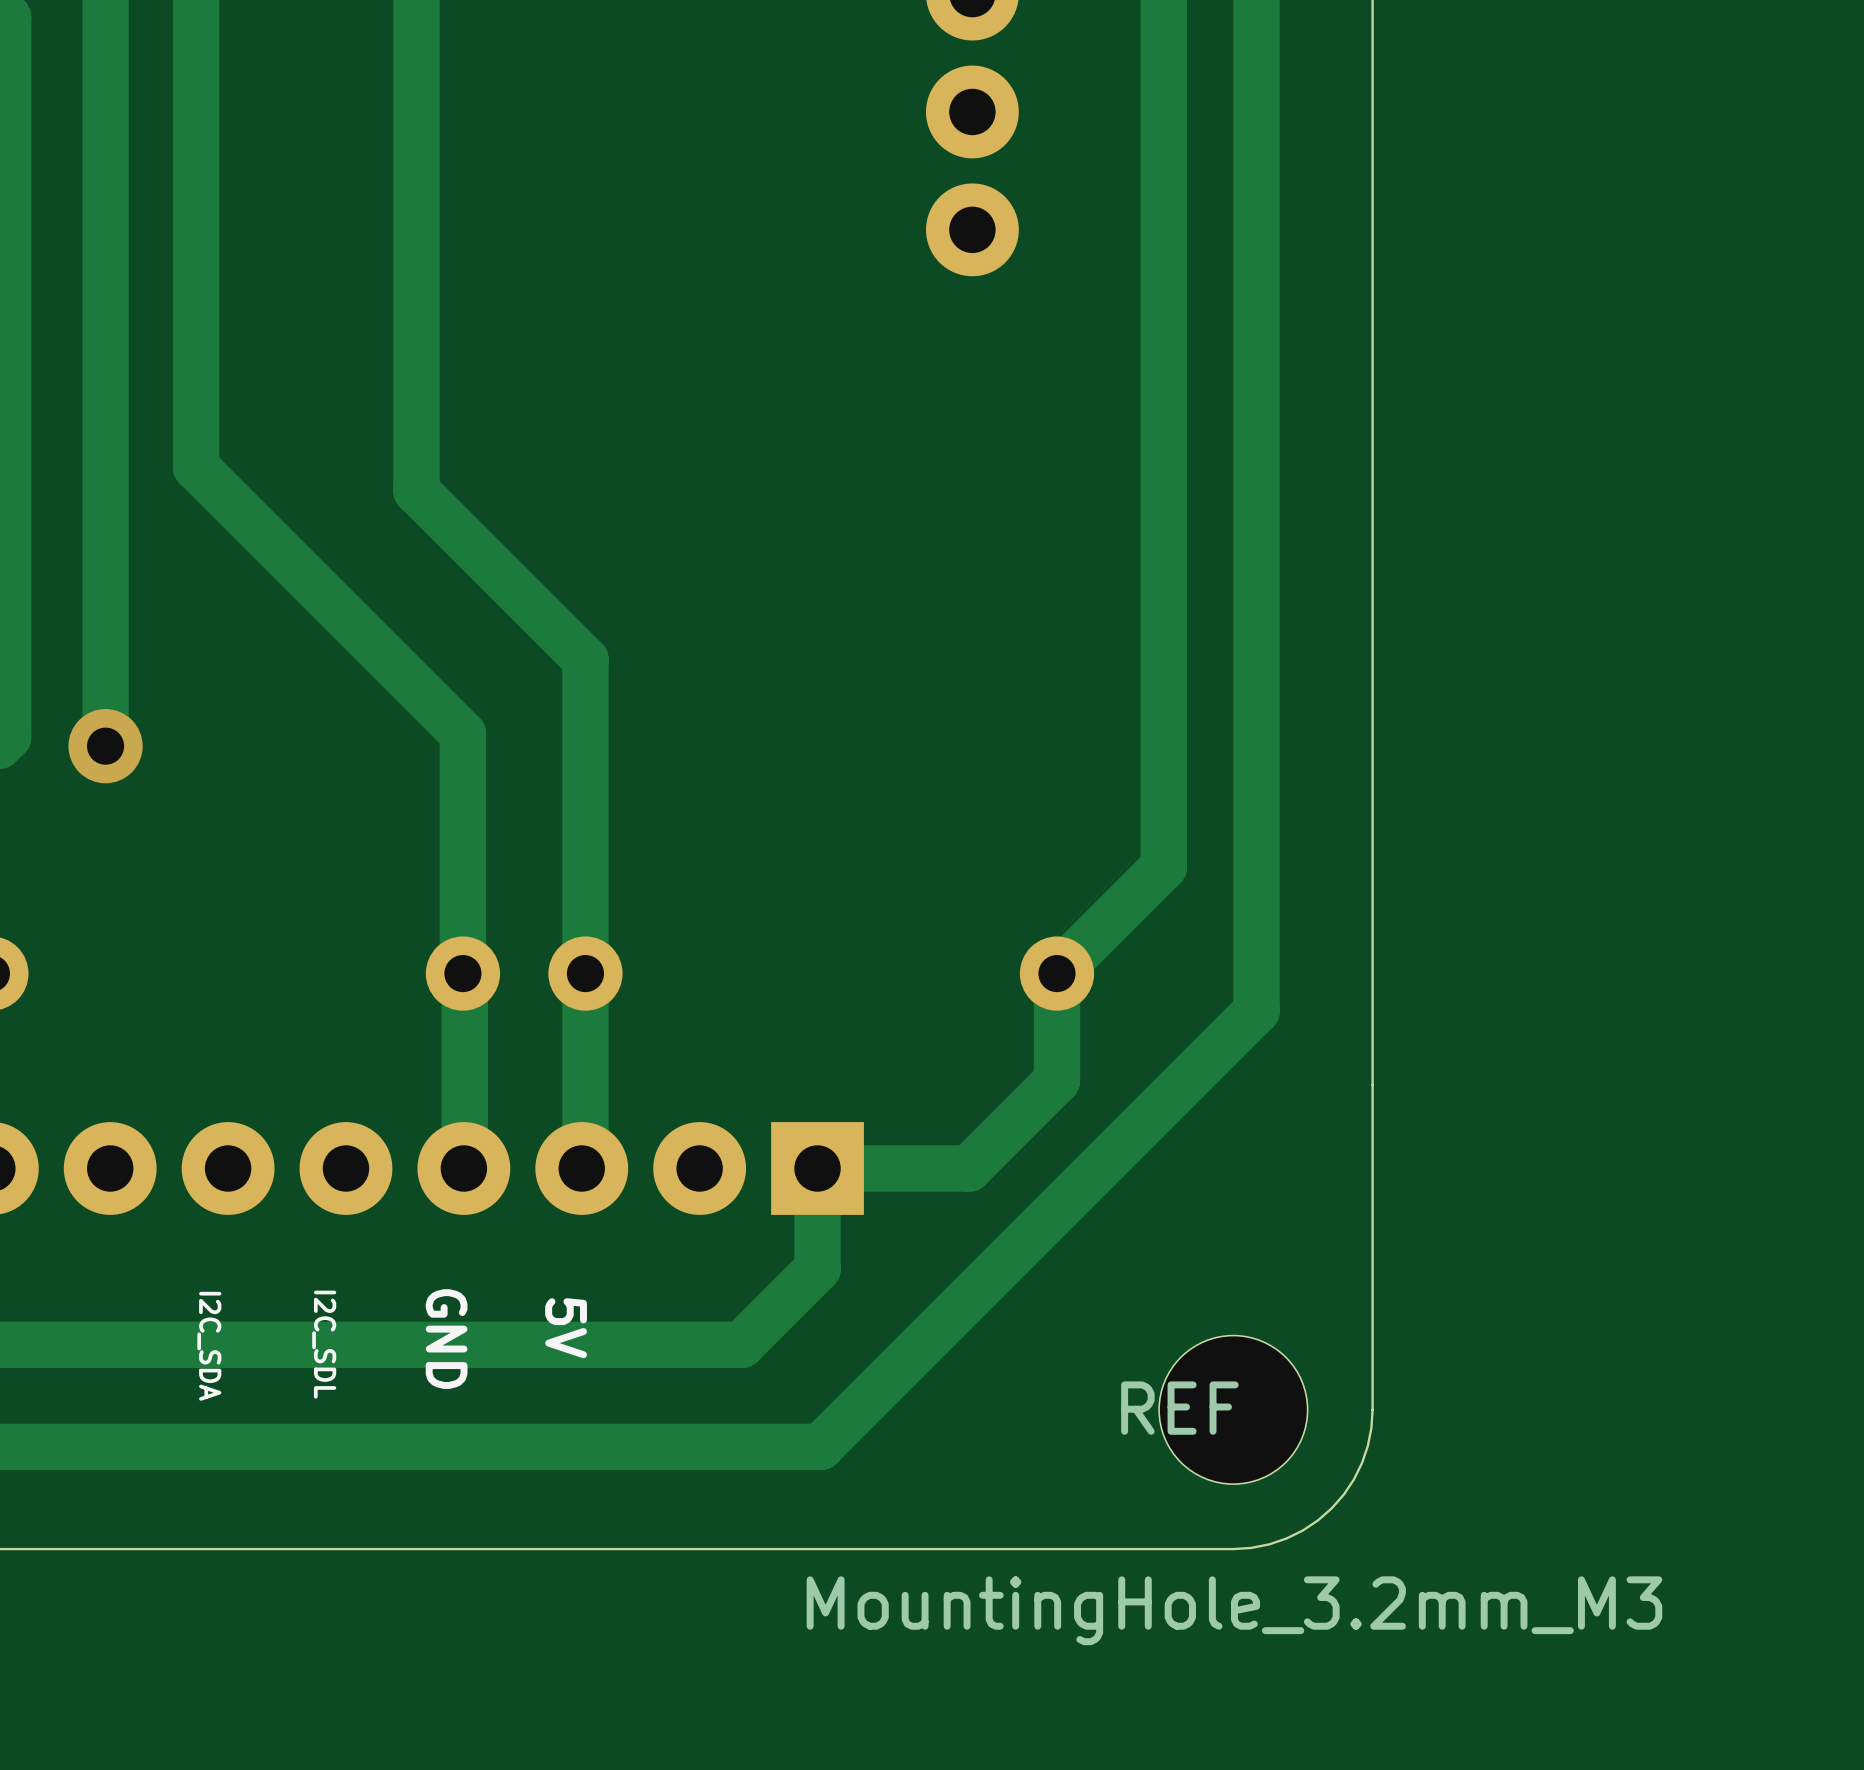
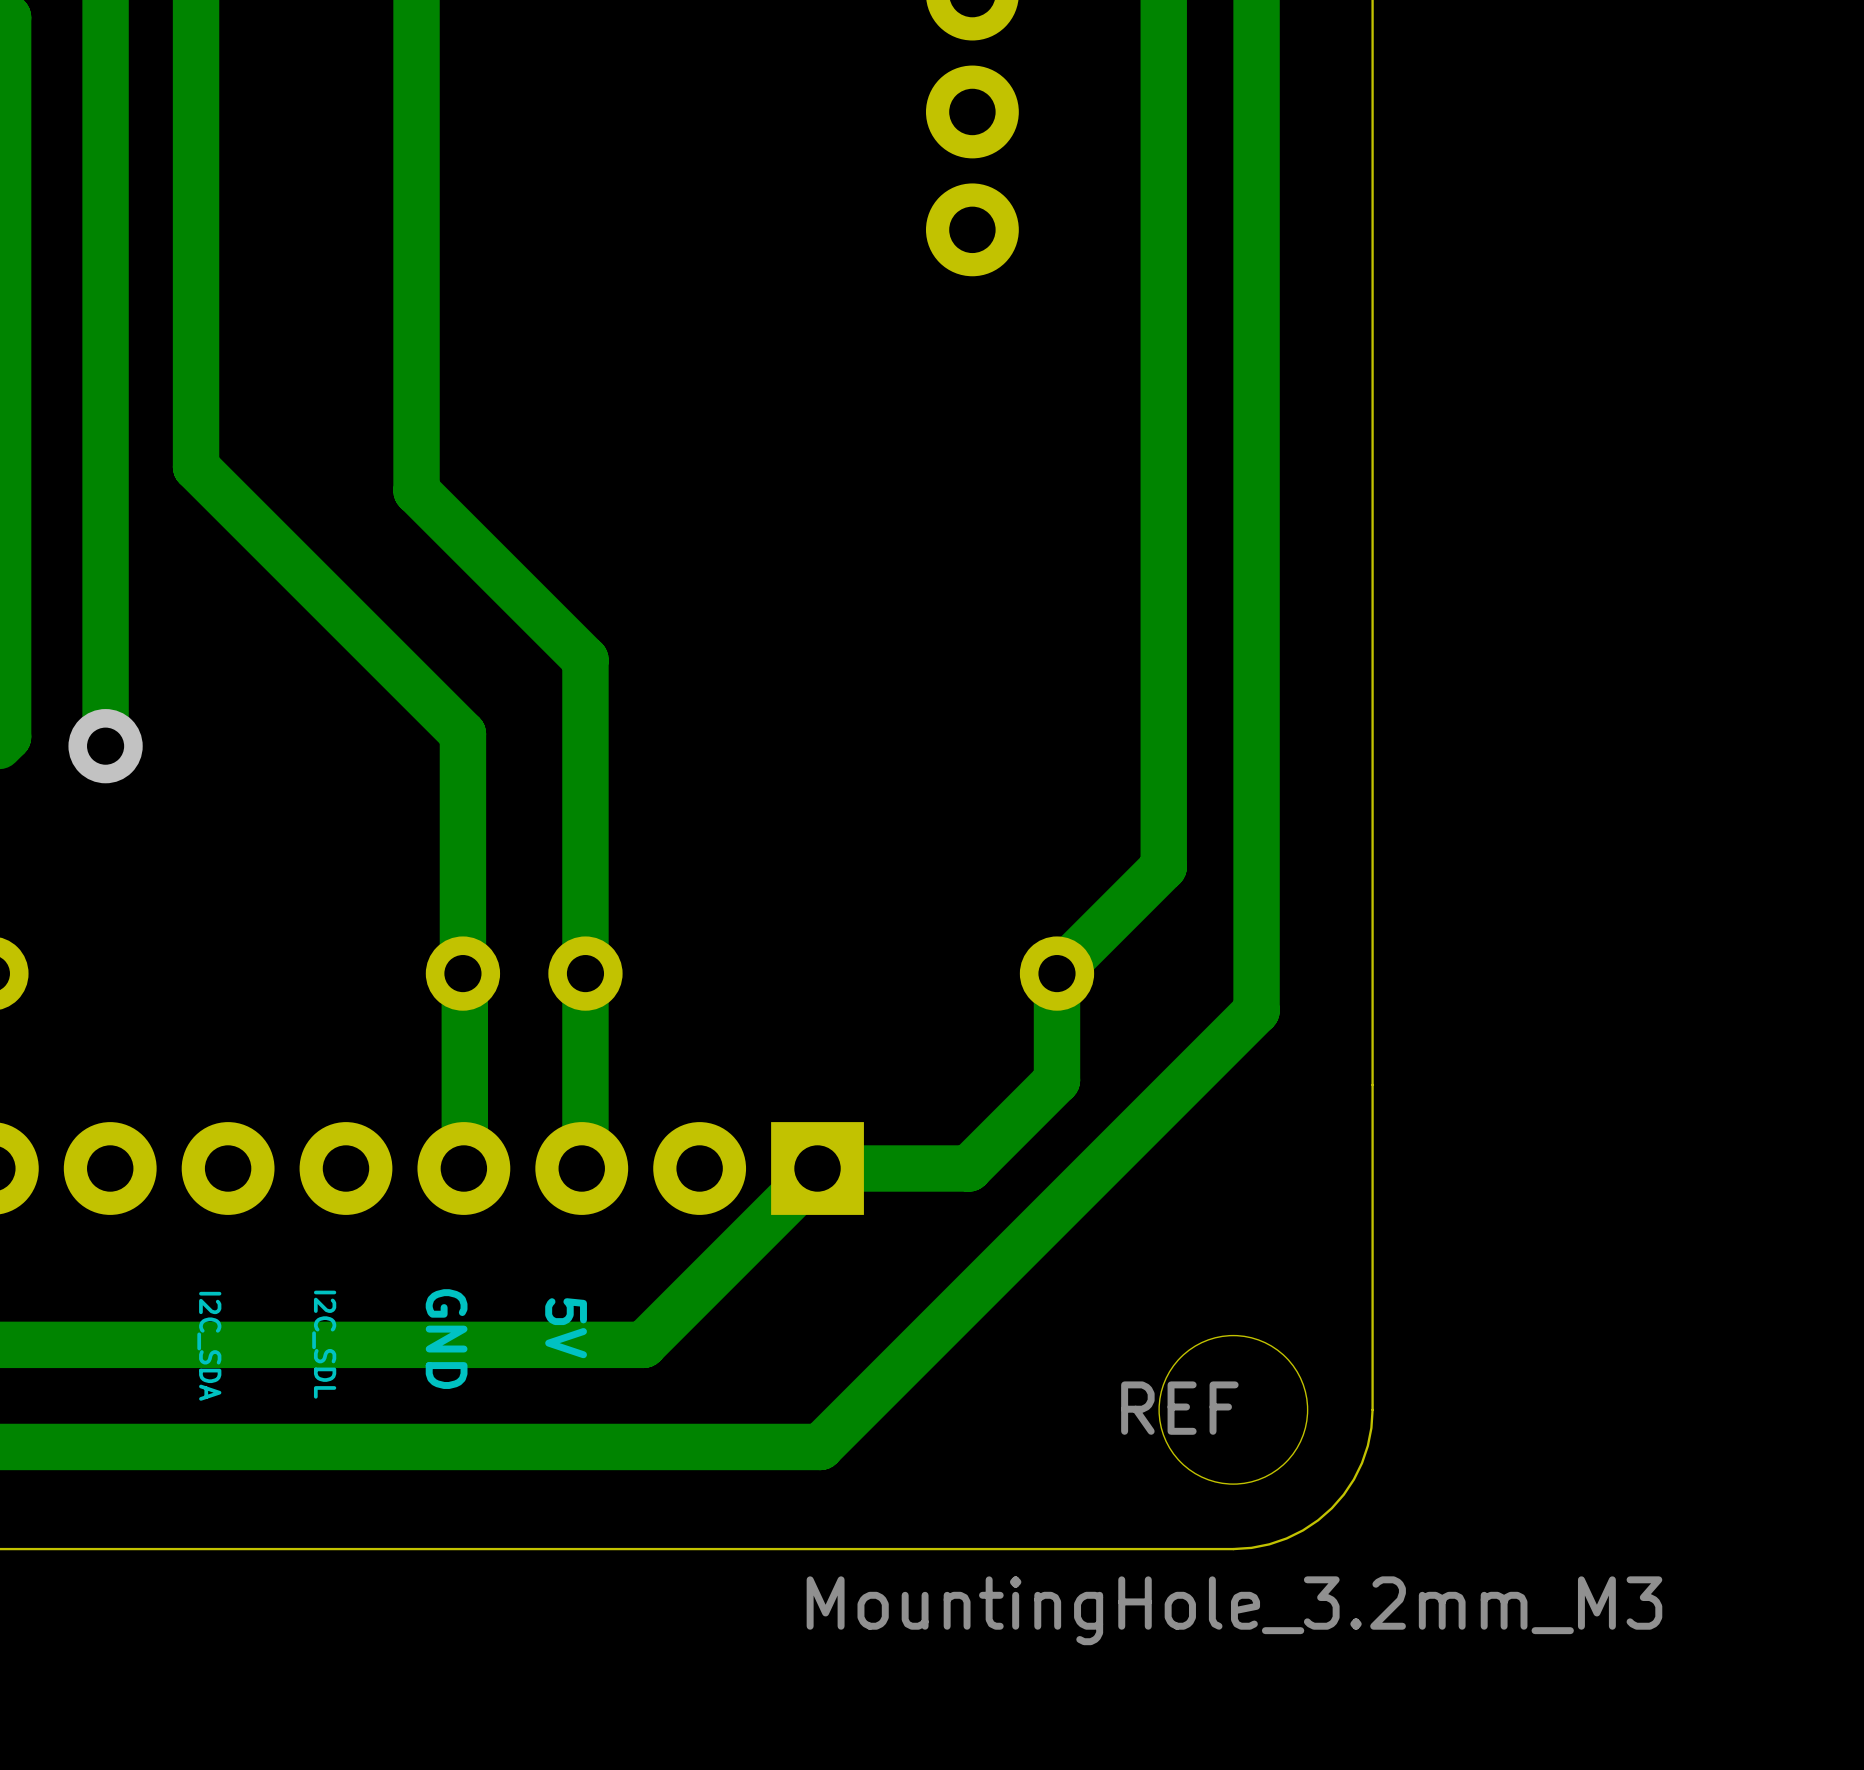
track: (817, 1170) (817, 1268) (741, 1344) (643, 1344) -> (817, 1170) (643, 1344)

